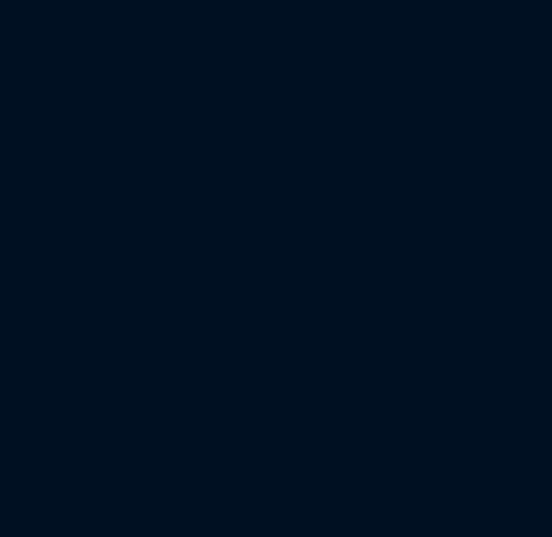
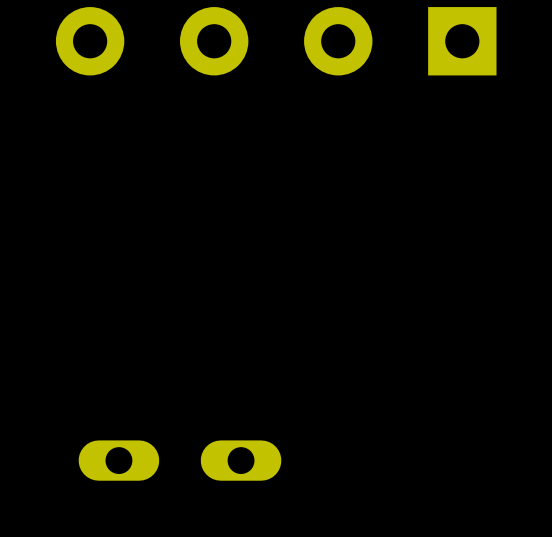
part: none -> (276, 41)
part: none -> (179, 460)

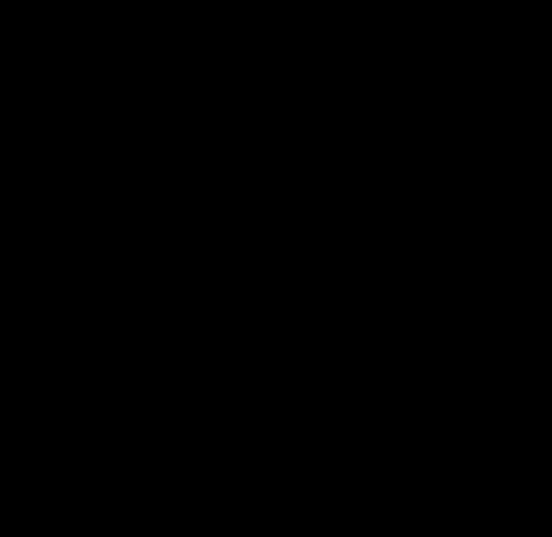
part: (276, 41) -> none
part: (179, 460) -> none

